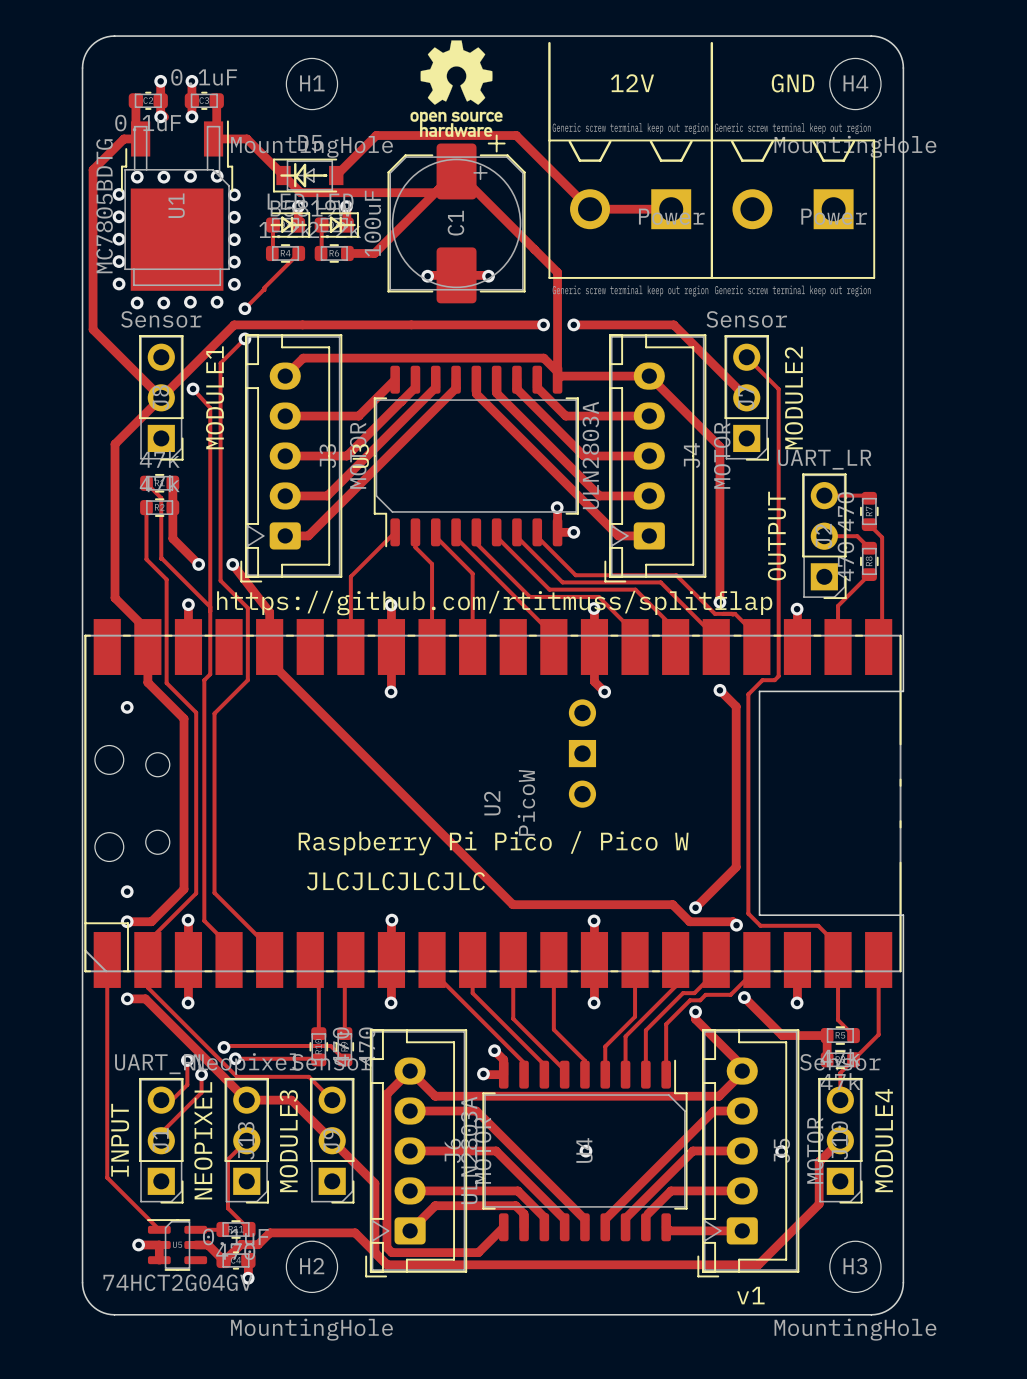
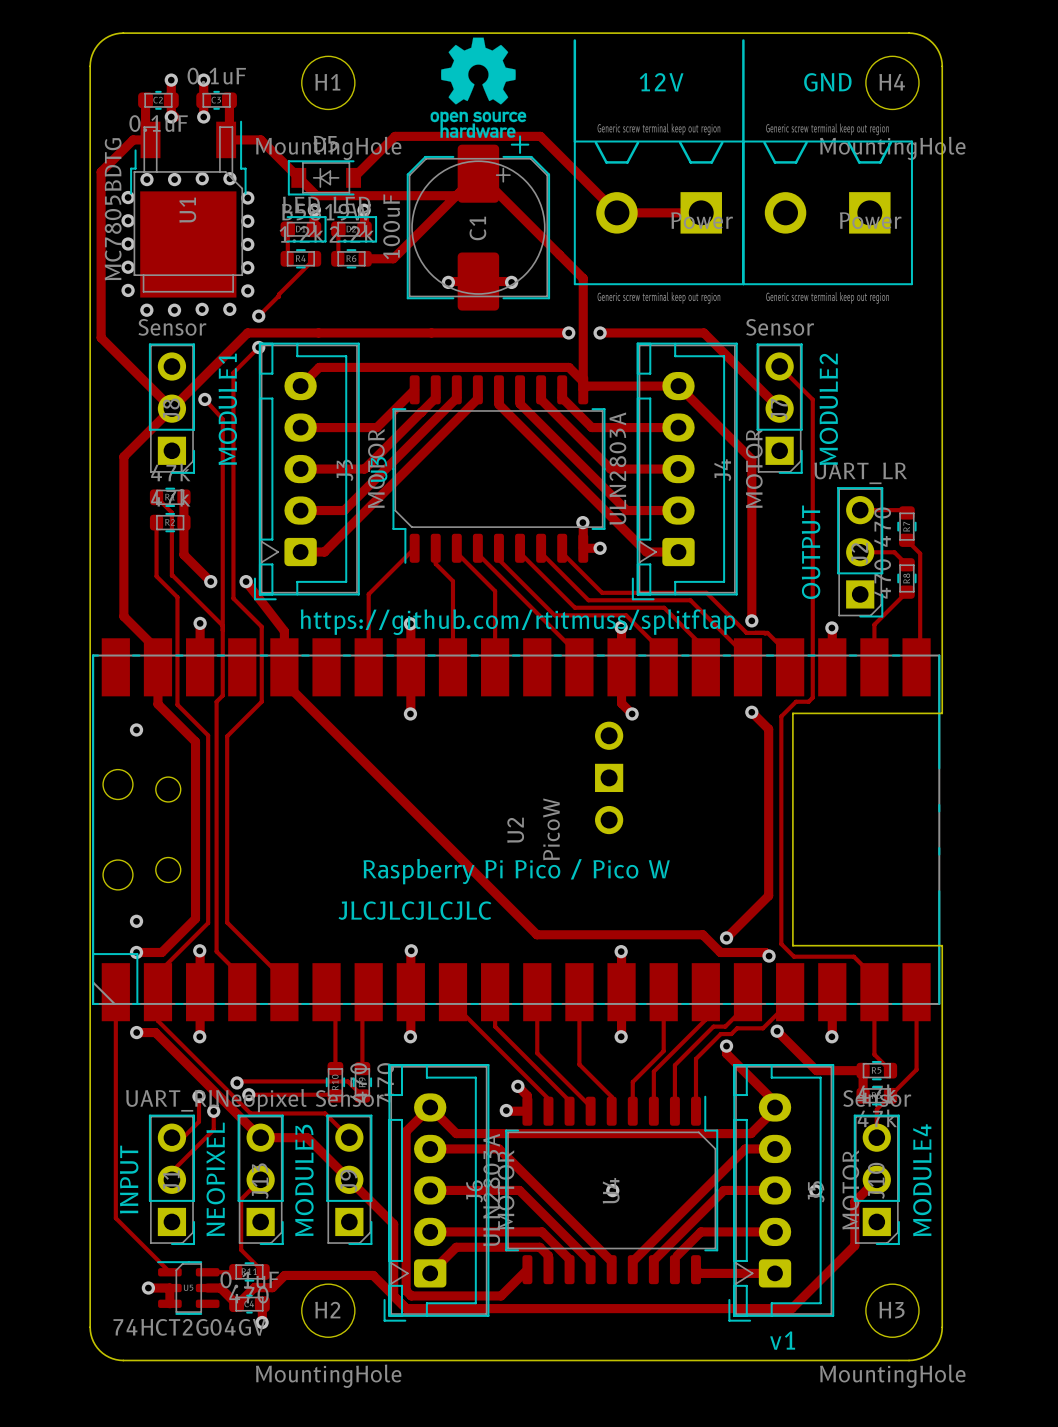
line: (295, 164) (295, 186) -> none
line: (281, 175) (296, 175) (305, 164) (305, 186) (296, 177) -> none
line: (305, 175) (326, 175) -> none
line: (292, 217) (292, 231) -> none
line: (340, 217) (340, 231) -> none
line: (290, 223) (282, 217) (282, 231) (290, 225) (305, 225) -> none
line: (339, 223) (331, 217) (331, 231) (339, 225) (354, 225) -> none
line: (271, 225) (282, 225) -> none
line: (320, 225) (331, 225) -> none

